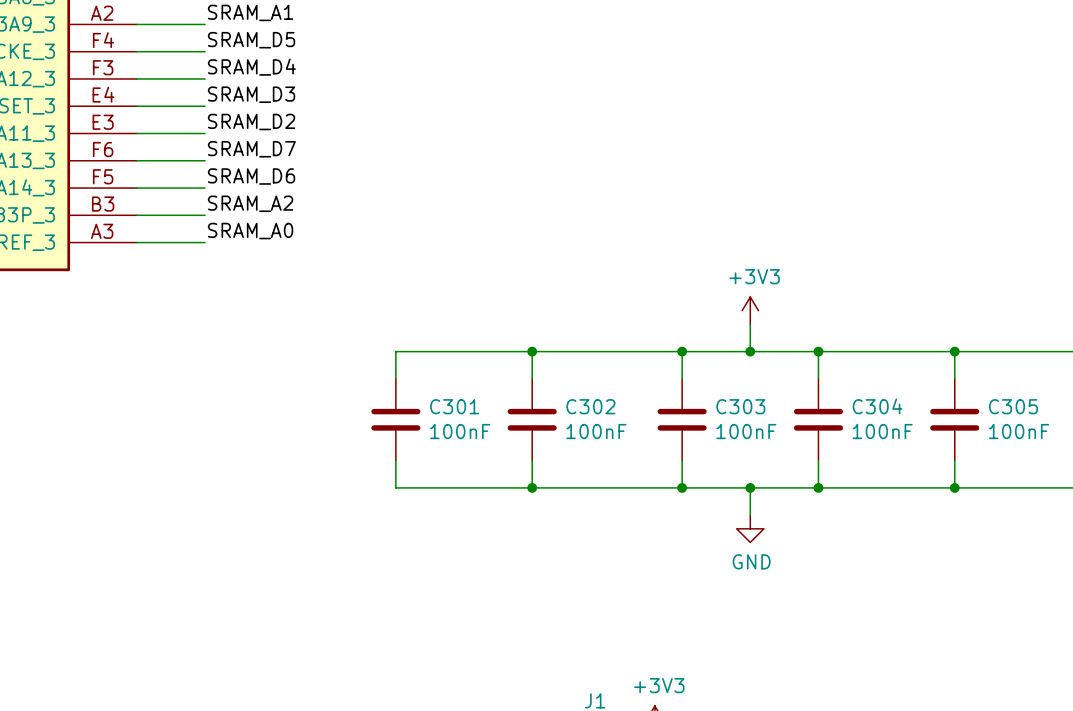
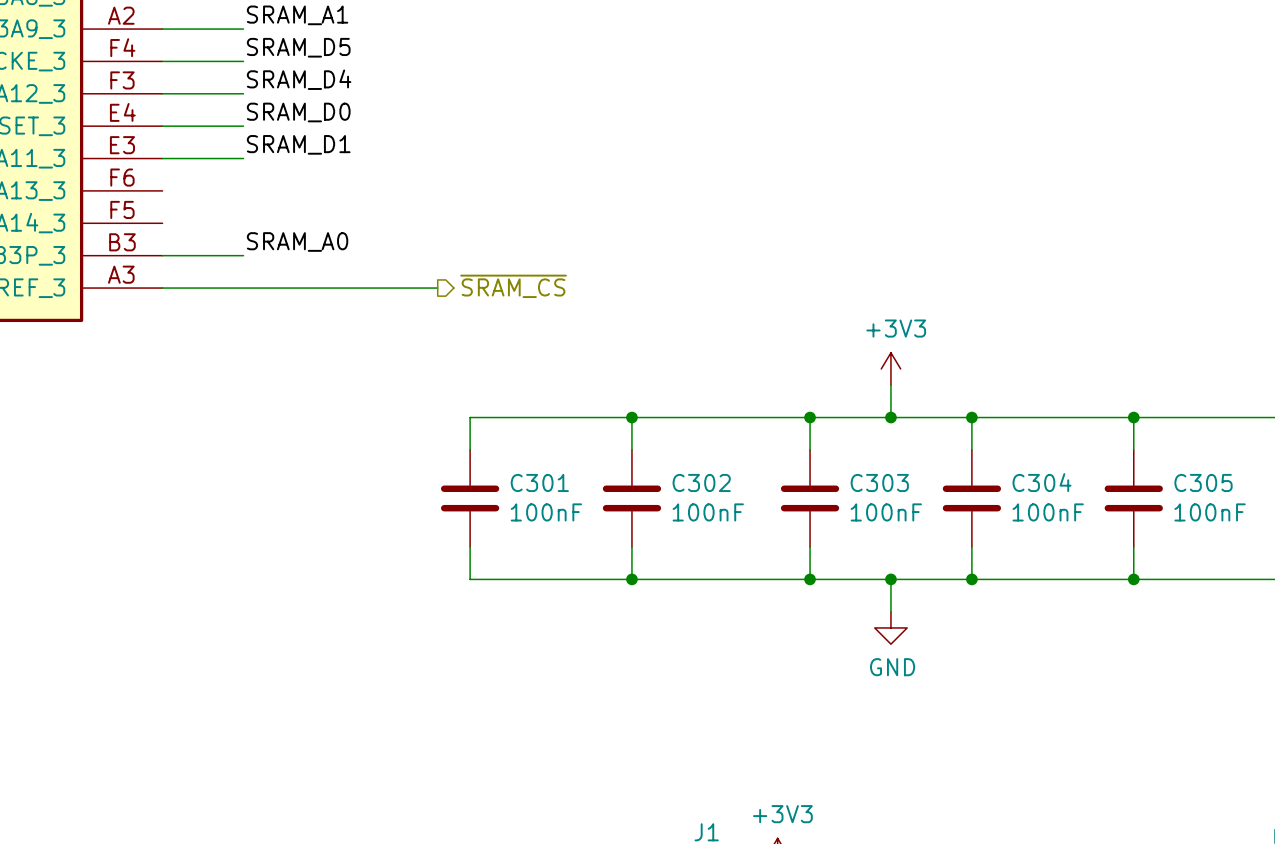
label: SRAM_D3 (251, 94) -> SRAM_D0 (298, 112)
label: SRAM_D2 (251, 121) -> SRAM_D1 (298, 144)
label: SRAM_D7 (251, 149) -> none
wire: (136, 160) (205, 160) -> none
label: SRAM_D6 (251, 176) -> none
wire: (136, 188) (205, 188) -> none
label: SRAM_A2 (250, 203) -> SRAM_A0 (297, 241)
label: SRAM_A0 (250, 231) -> none
hierarchical label: none -> ~{SRAM_CS} (513, 286)
wire: none -> (243, 288) (437, 288)

